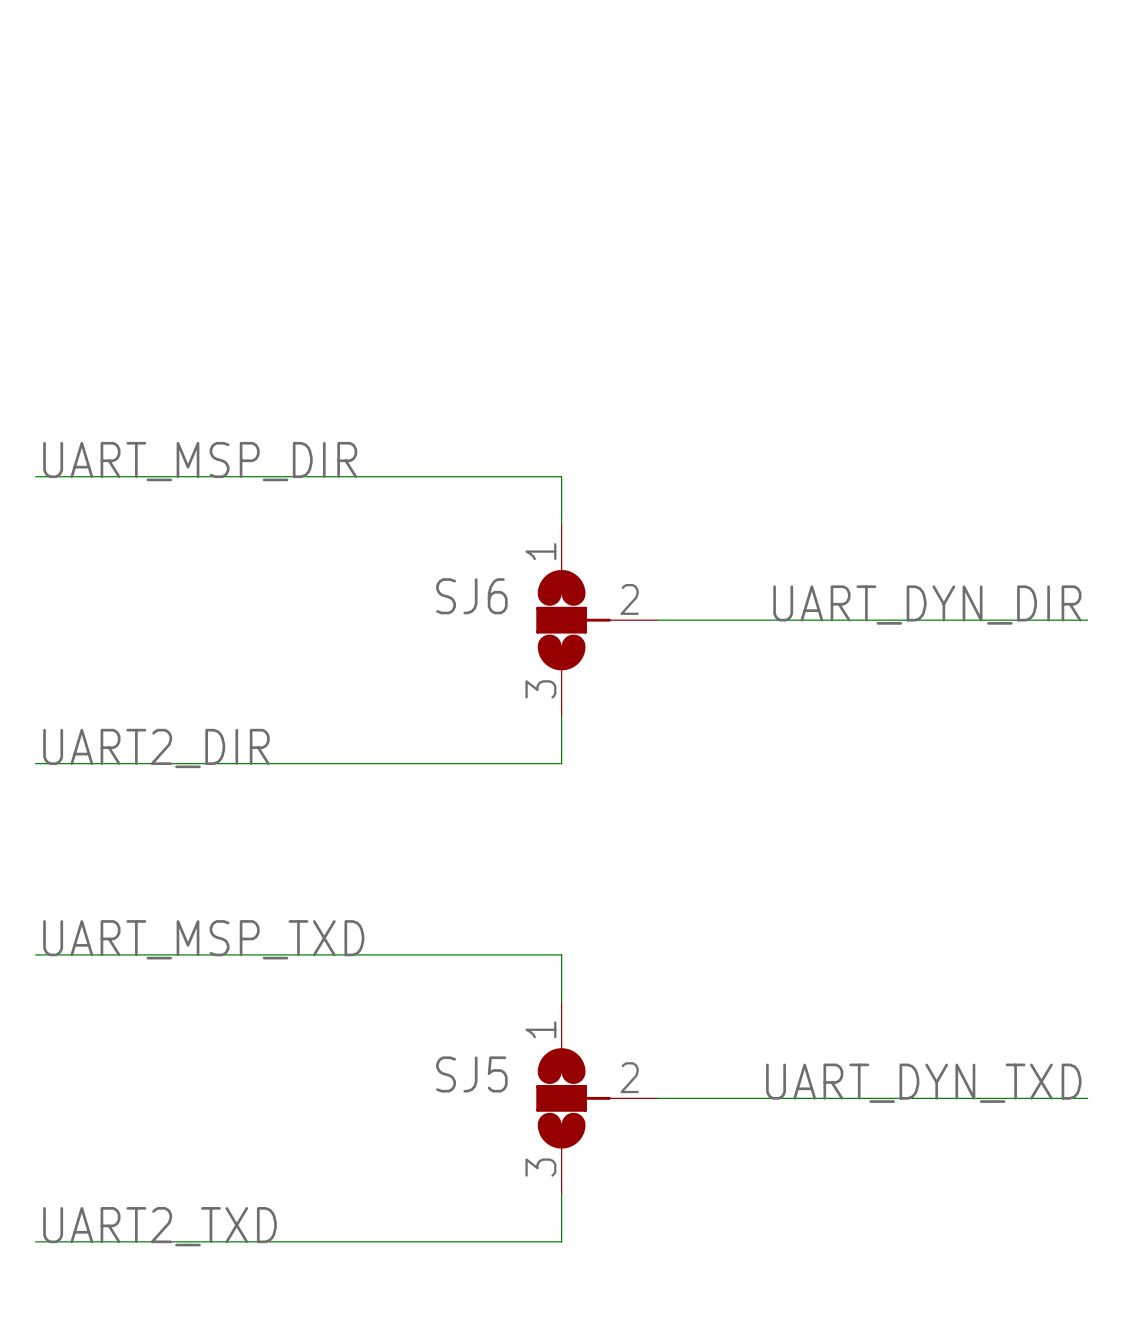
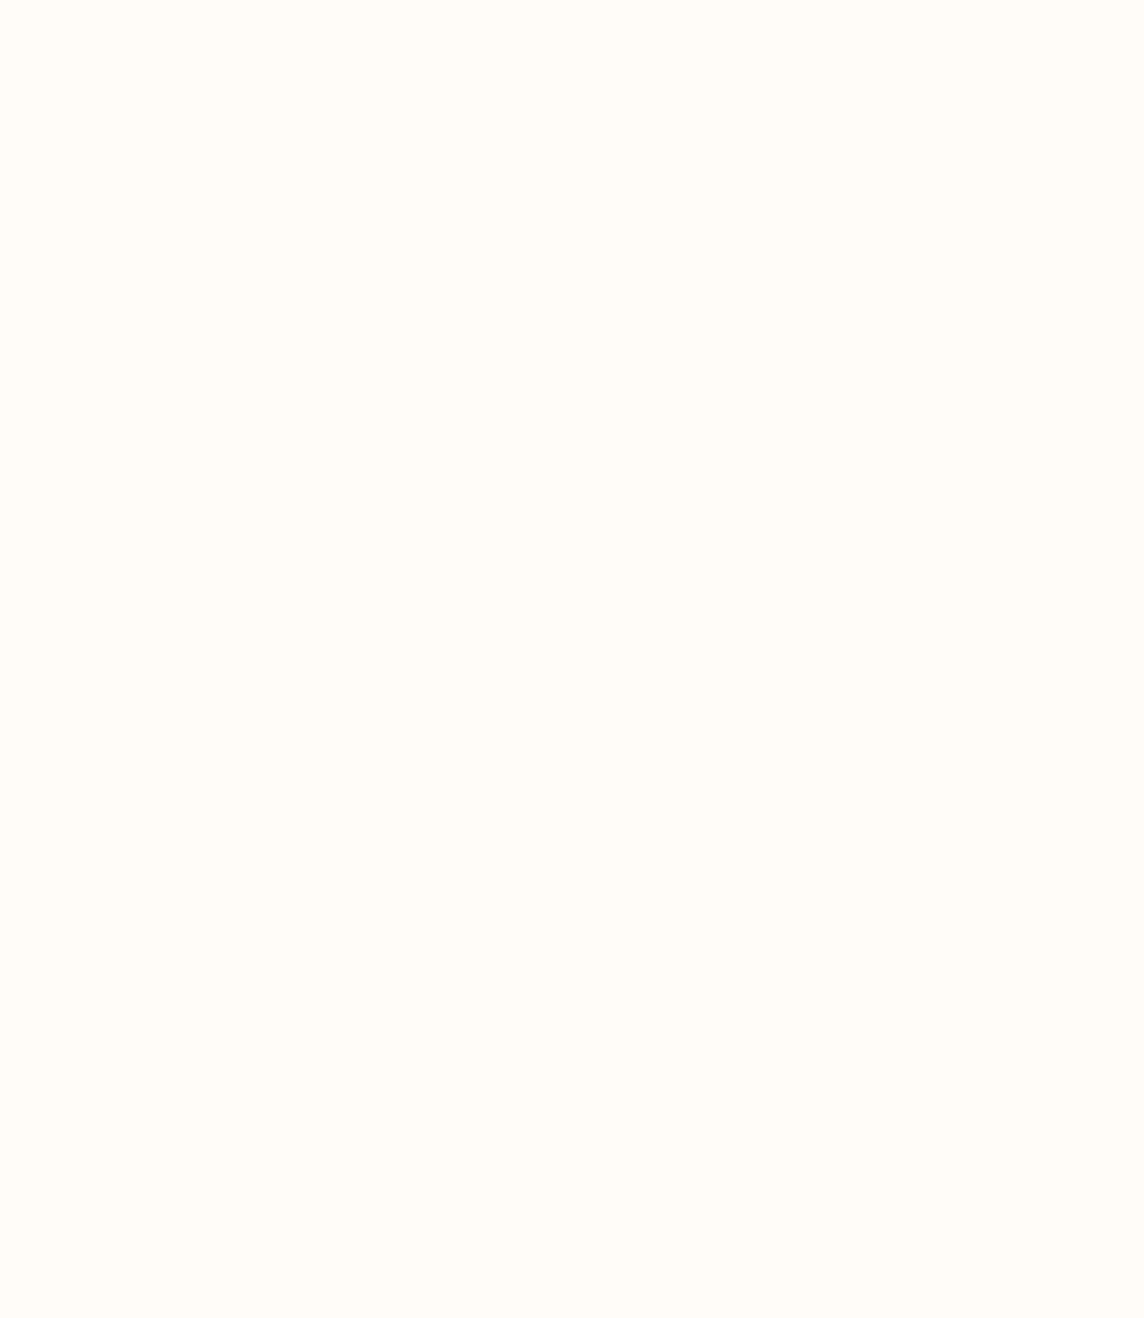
label: UART_MSP_DIR (200, 461) -> none
wire: (35, 476) (561, 476) (561, 524) -> none
label: UART_DYN_DIR (927, 605) -> none
SJ6: (596, 620) -> none
wire: (657, 620) (1087, 620) -> none
wire: (561, 715) (561, 763) (35, 763) -> none
label: UART2_DIR (156, 748) -> none
label: UART_MSP_TXD (203, 939) -> none
wire: (35, 954) (561, 954) (561, 1002) -> none
label: UART_DYN_TXD (923, 1083) -> none
SJ5: (596, 1098) -> none
wire: (657, 1098) (1087, 1098) -> none
wire: (561, 1194) (561, 1241) (35, 1241) -> none
label: UART2_TXD (160, 1226) -> none

